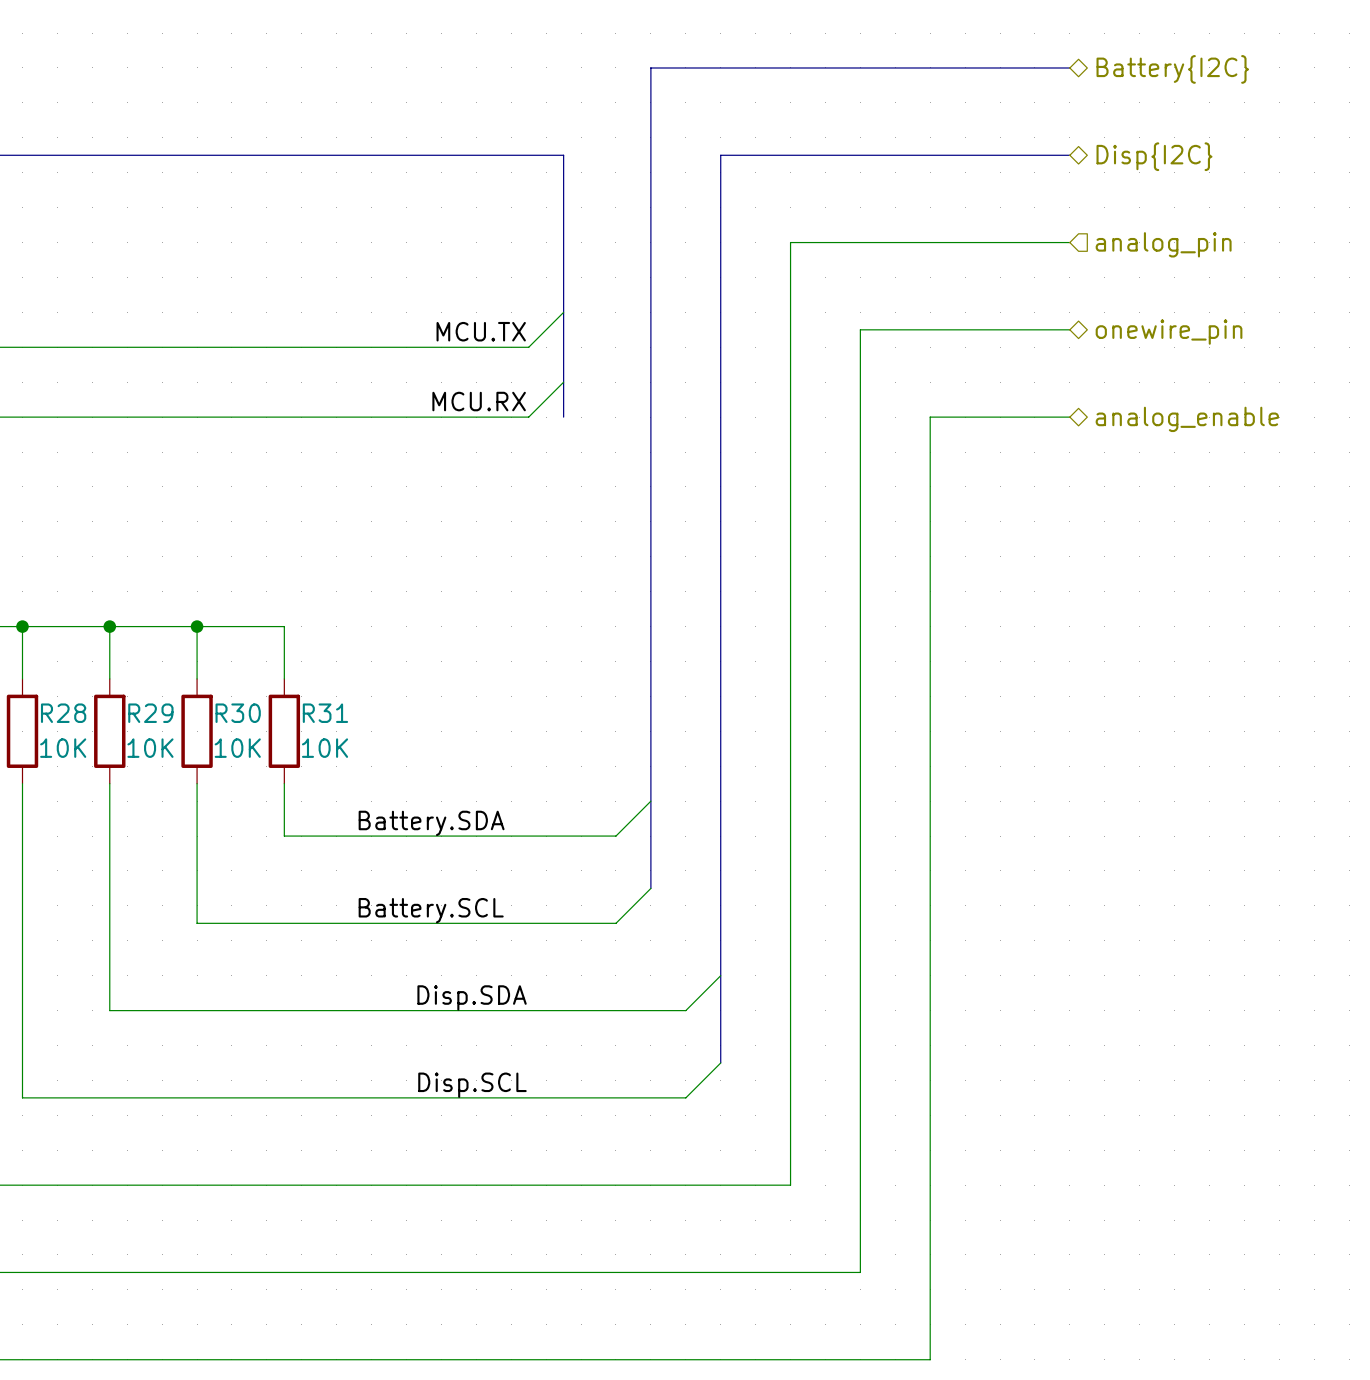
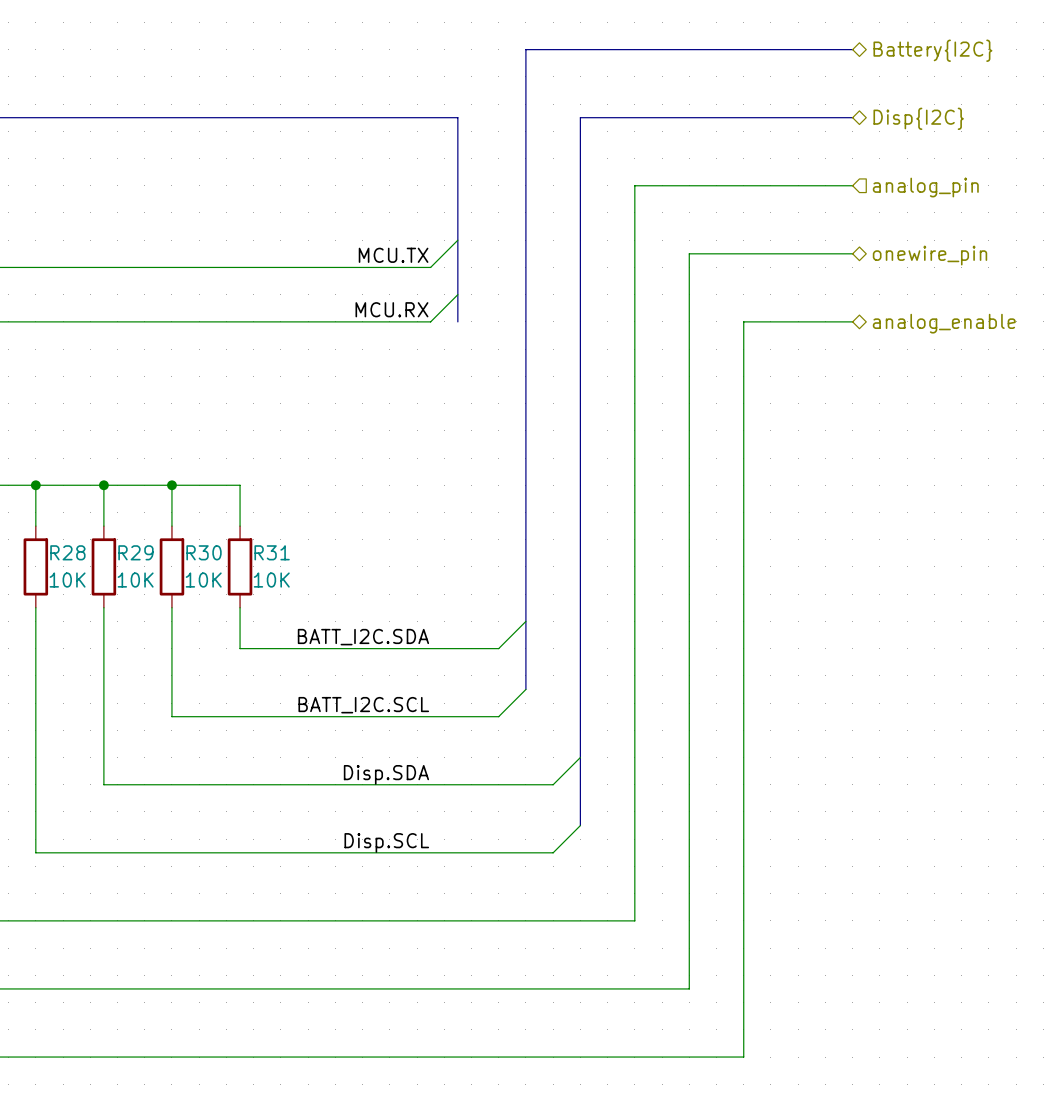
label: none -> BATT_I2C.SDA (363, 637)
label: Battery.SDA (431, 823) -> none
label: none -> BATT_I2C.SCL (363, 705)
label: Battery.SCL (431, 910) -> none

